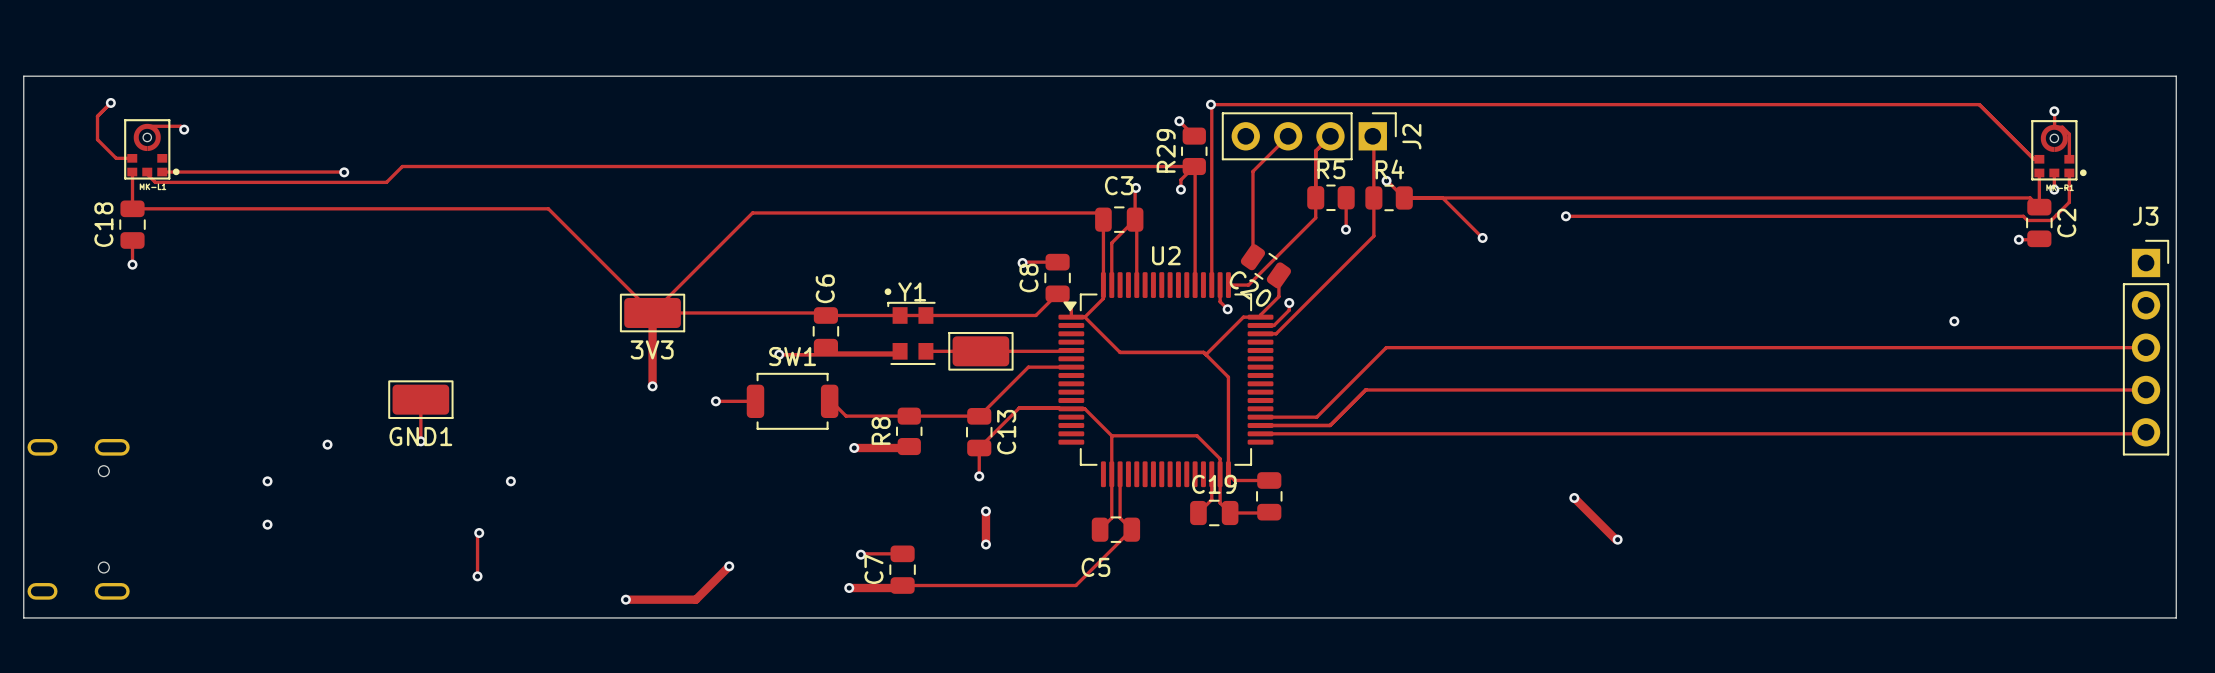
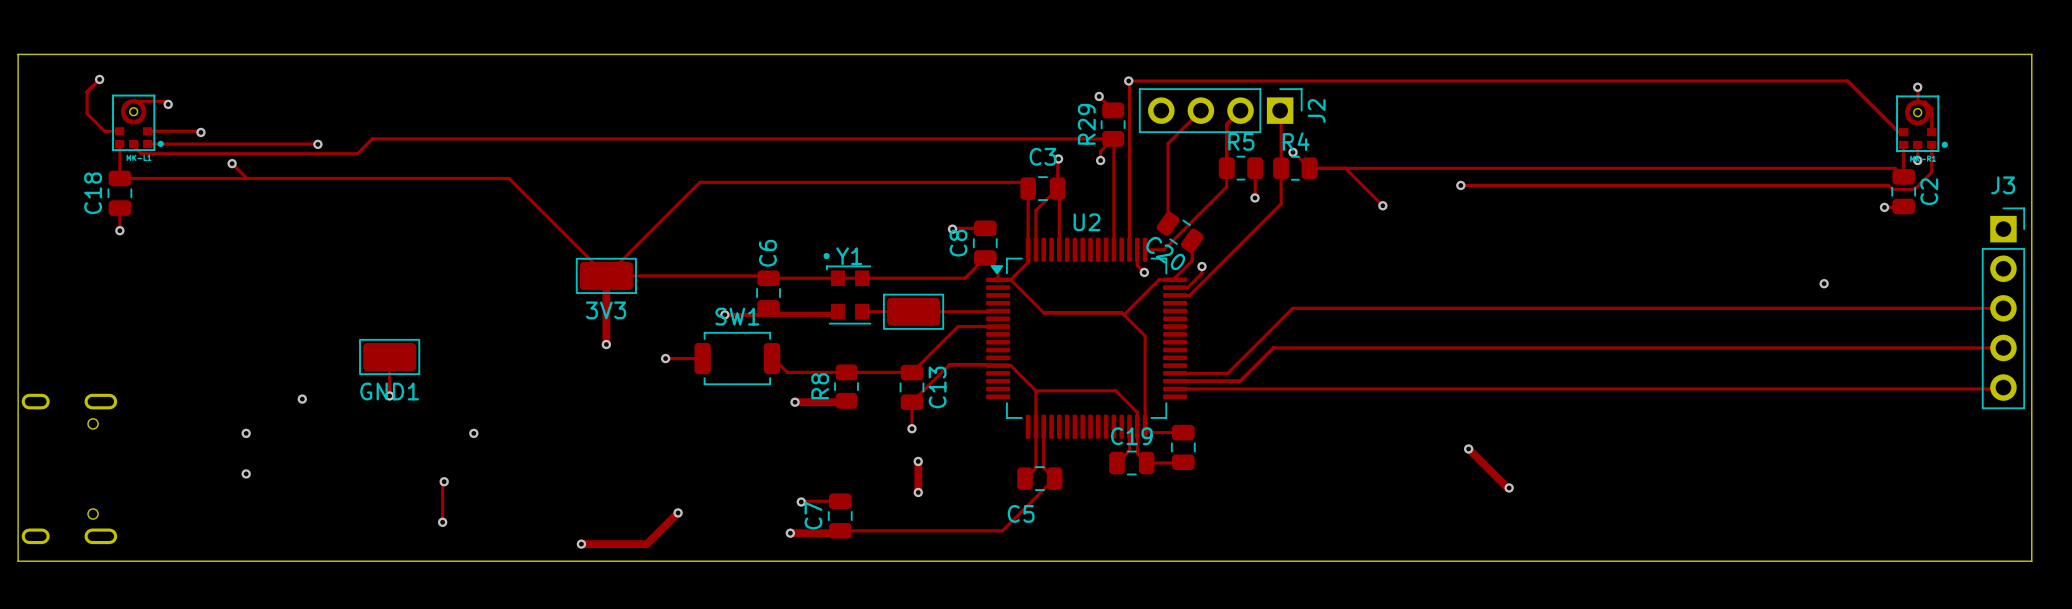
track: none -> (147, 131) (200, 132)
via: none -> (200, 132)
track: none -> (232, 163) (246, 178)
via: none -> (232, 163)

